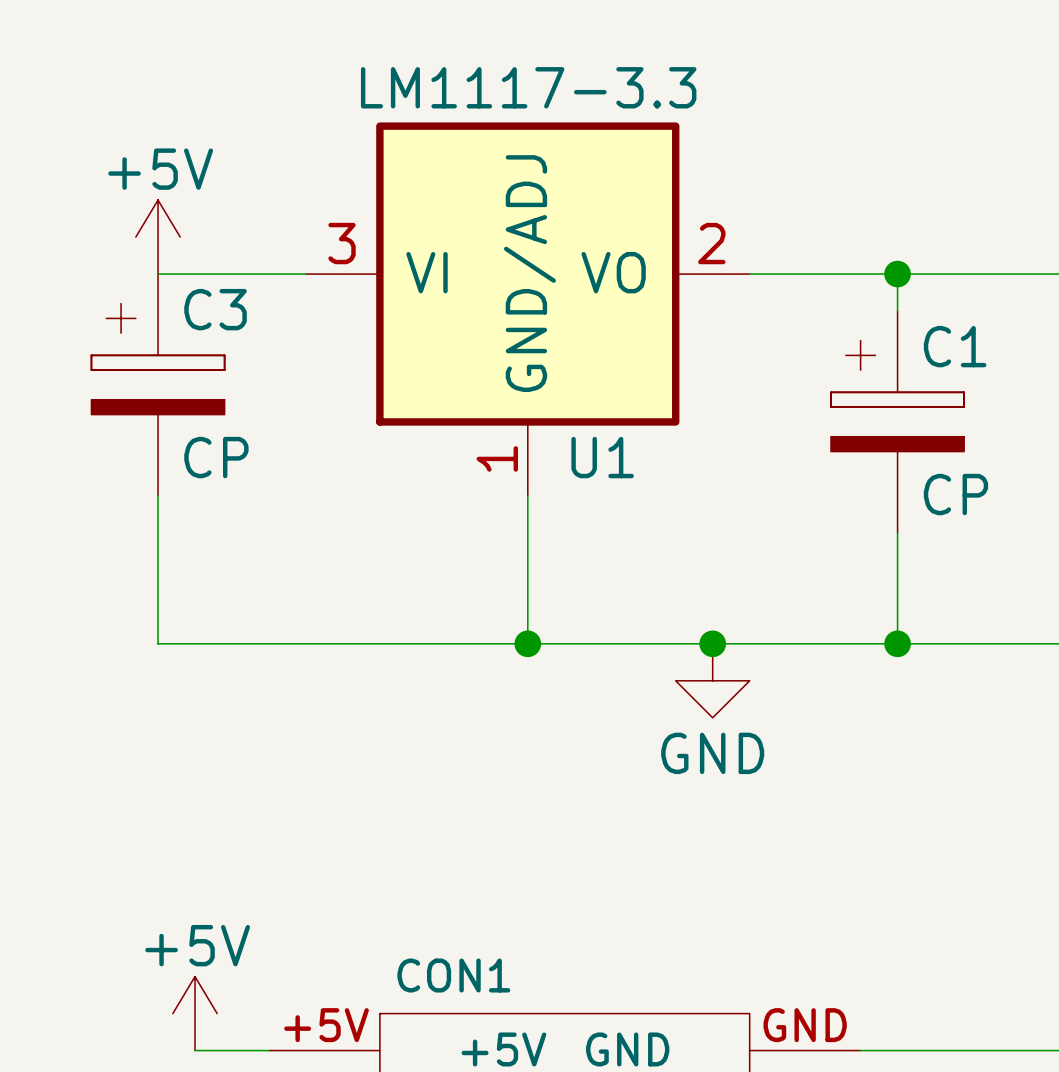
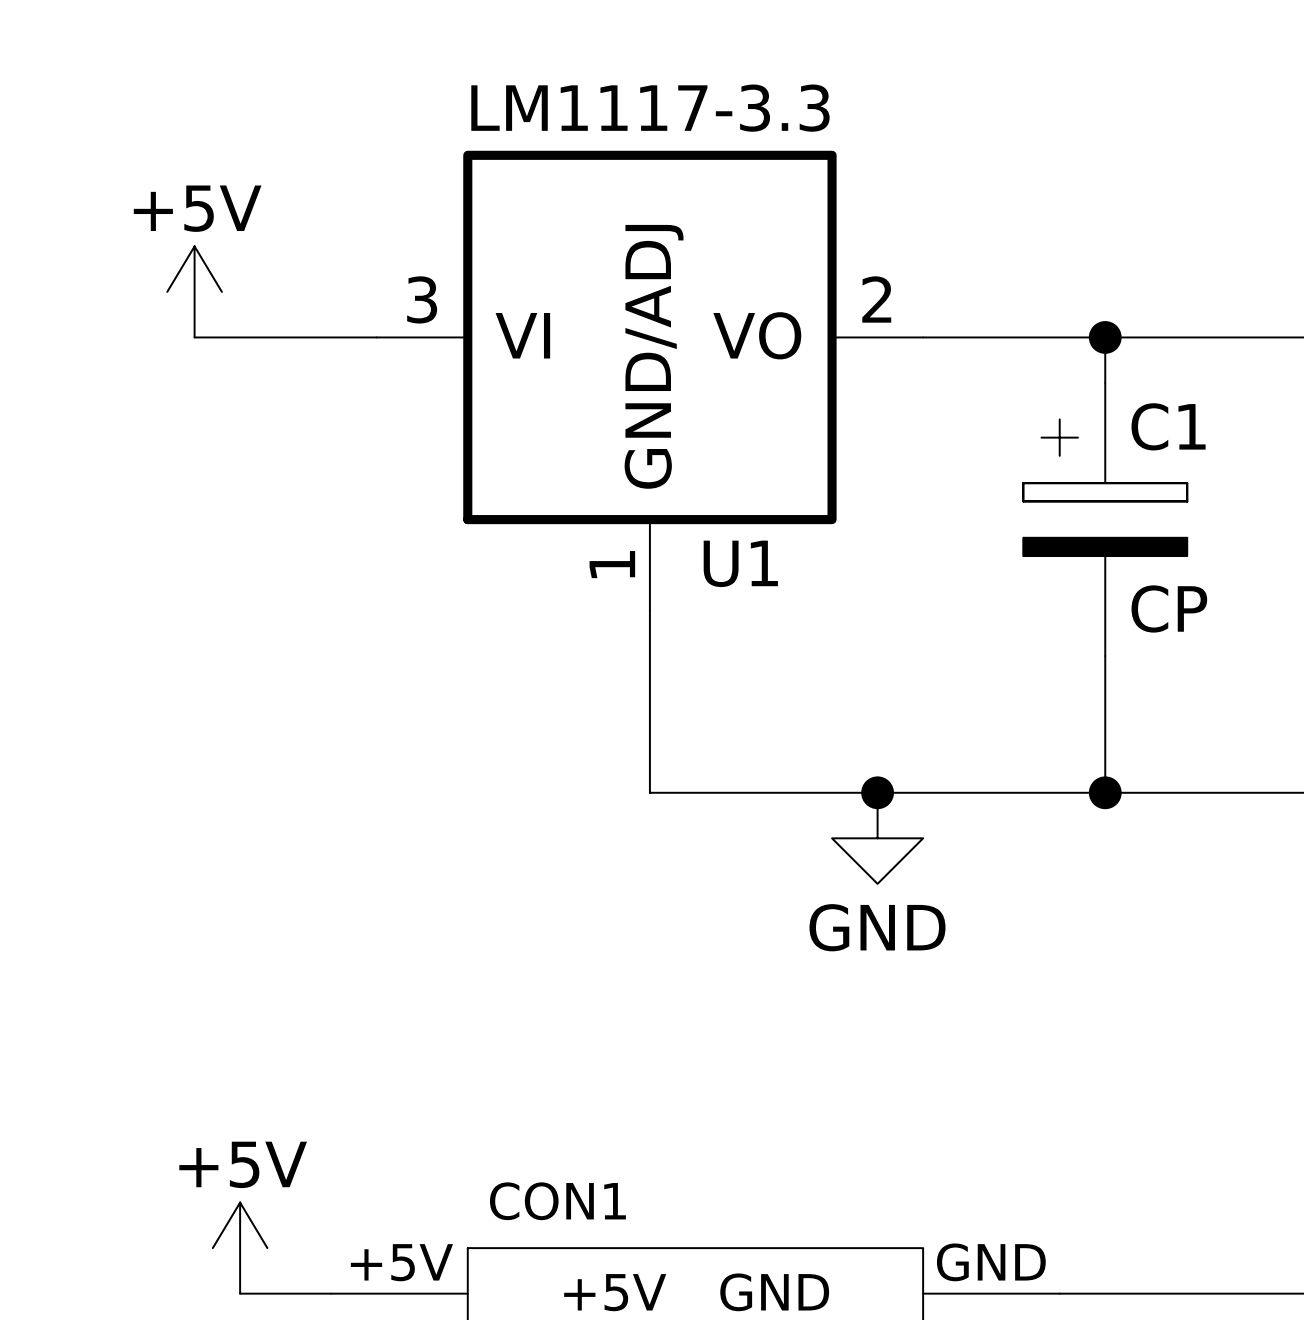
C3: CP (158, 384) -> none
wire: (158, 495) (158, 643) (527, 643) -> none
junction: (527, 643) -> none

